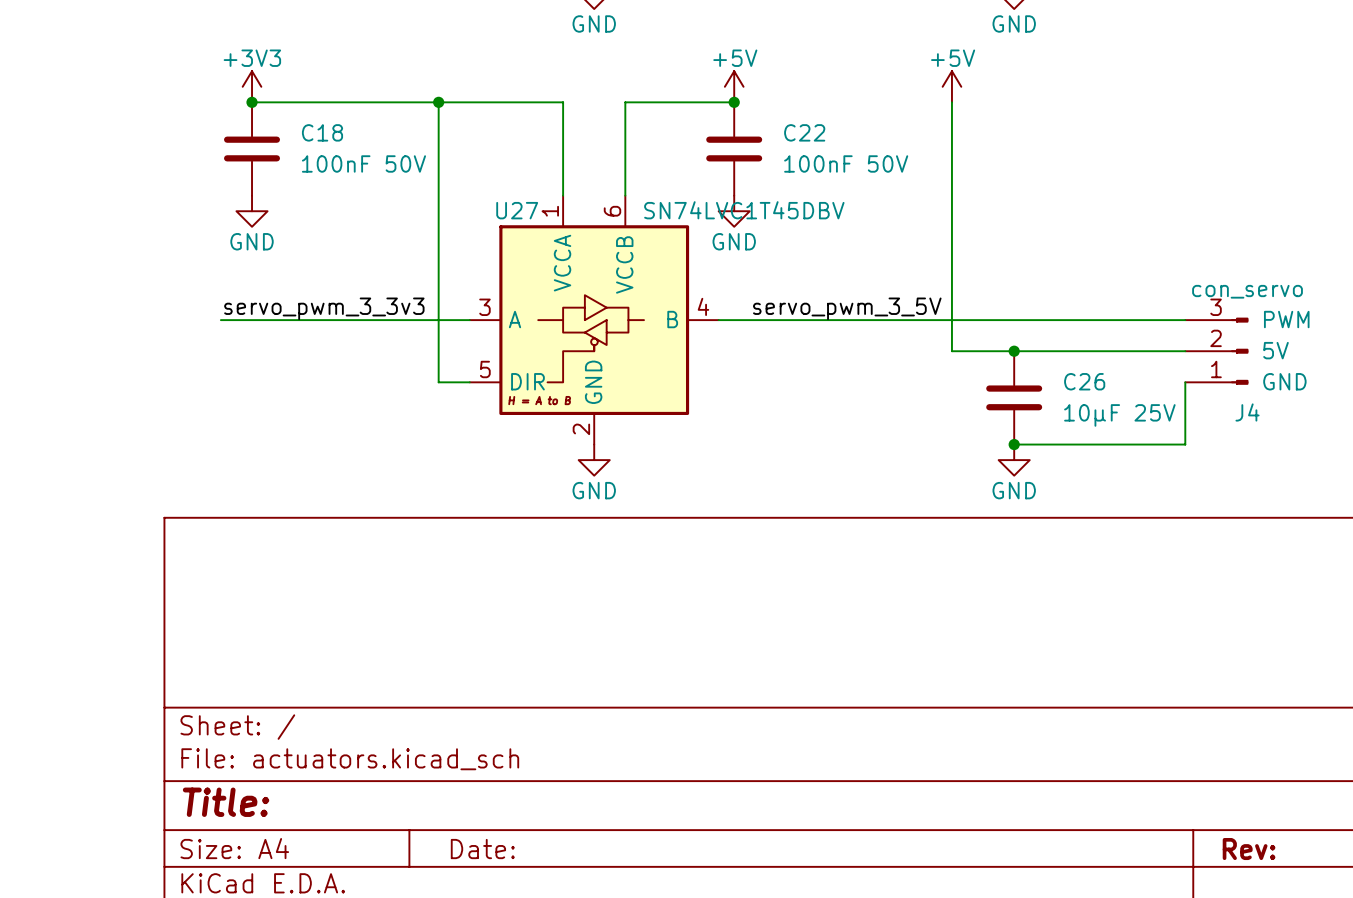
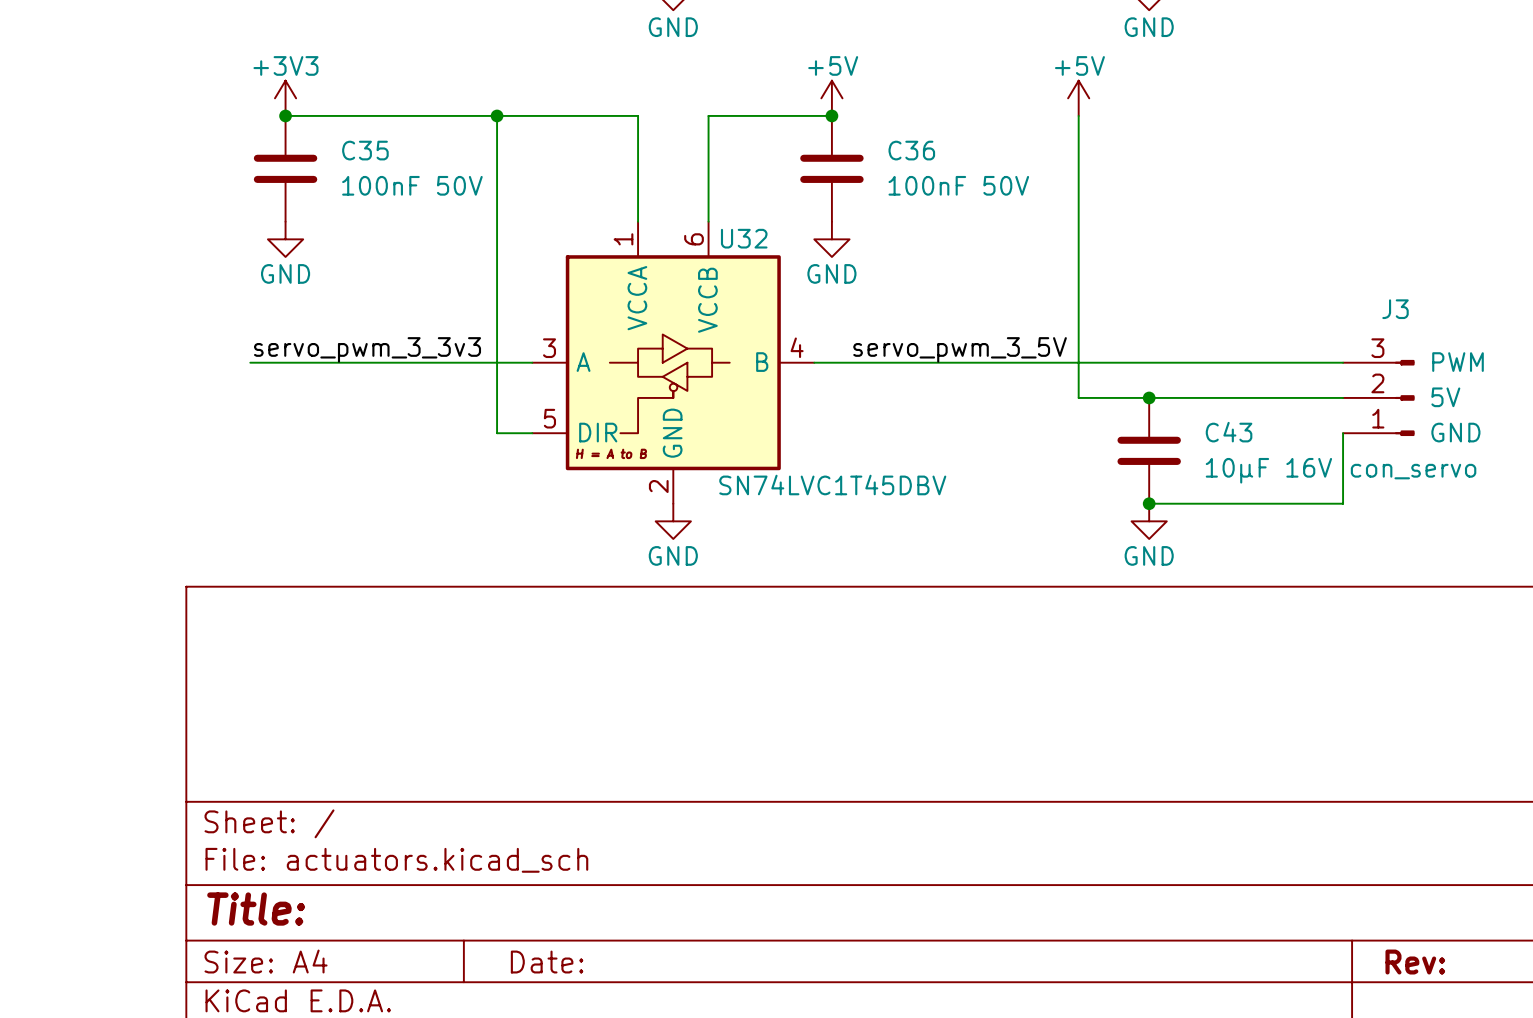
C18 name: C18 (322, 132) -> C35 (365, 150)
C22 name: C22 (804, 132) -> C36 (911, 150)
U27 name: U27 (517, 210) -> U32 (744, 238)
U27 value position: SN74LVC1T45DBV (744, 210) -> SN74LVC1T45DBV (832, 485)
J4 value position: con_servo (1247, 291) -> con_servo (1413, 471)
C26 name: C26 (1084, 381) -> C43 (1229, 432)
J4 name: J4 (1247, 412) -> J3 (1395, 309)
C26 value: 10µF 25V (1119, 415) -> 10µF 16V (1268, 470)

